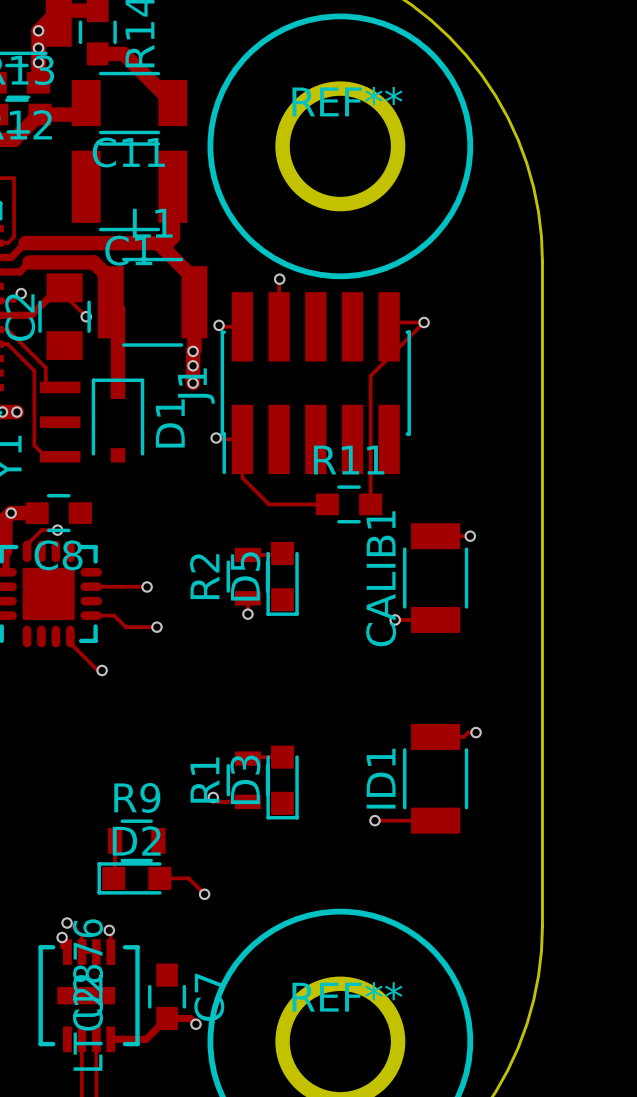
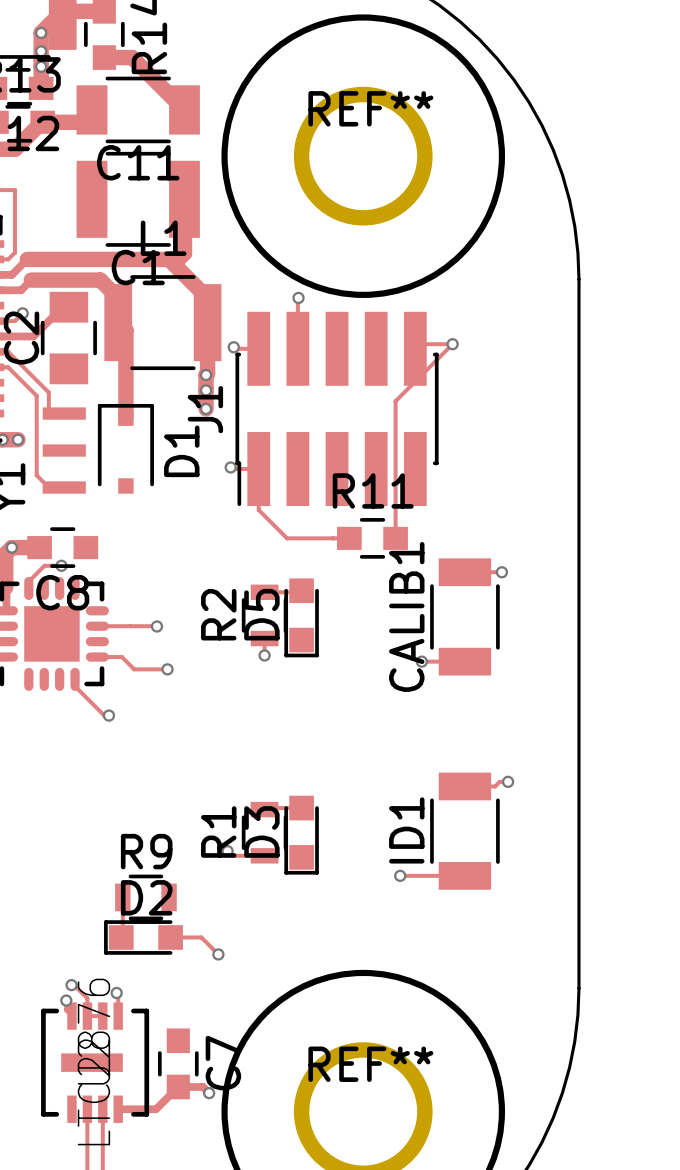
track: (64, 287) (64, 295) (86, 316) -> none
via: (86, 316) -> none

